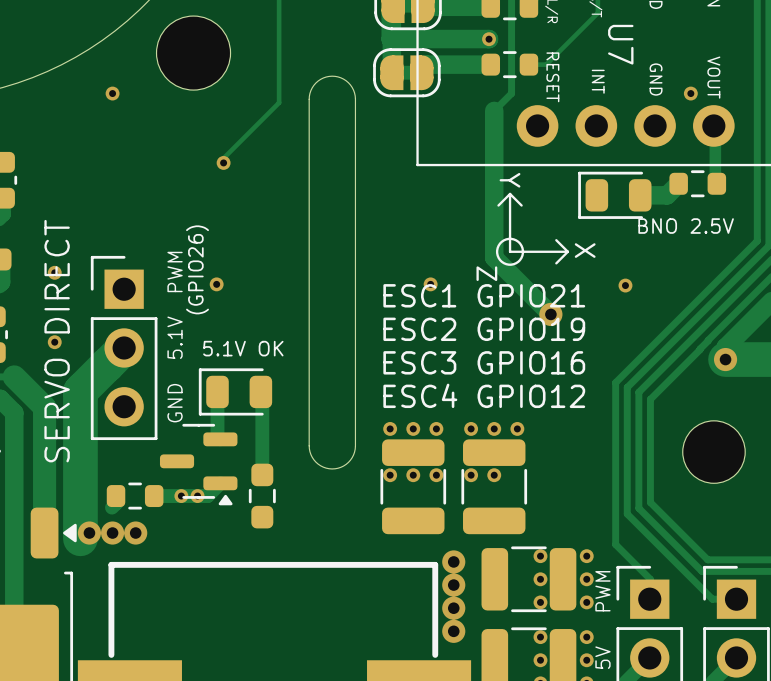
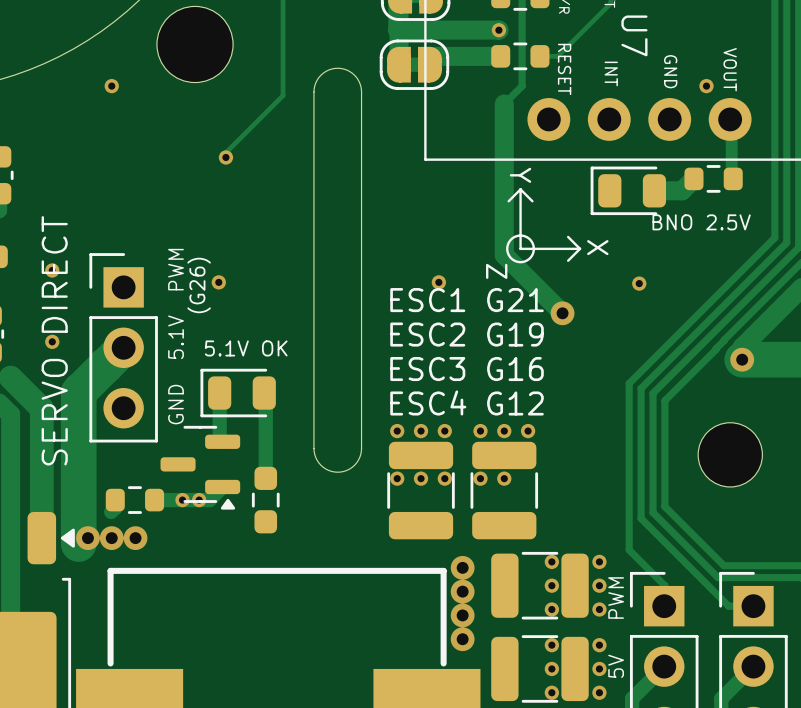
text: (GPIO26) (197, 269) -> (G26) (199, 285)
text: ESC1 GPIO21 (484, 295) -> ESC1 G21 (467, 300)
text: ESC2 GPIO19 (484, 329) -> ESC2 G19 (467, 334)
text: ESC3 GPIO16 (484, 362) -> ESC3 G16 (467, 369)
text: ESC4 GPIO12 (484, 395) -> ESC4 G12 (467, 402)

